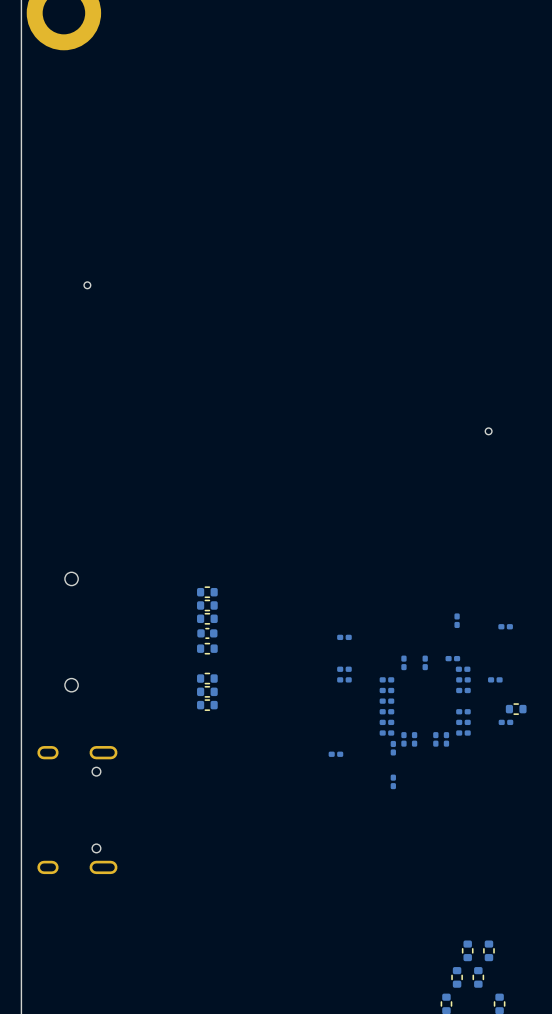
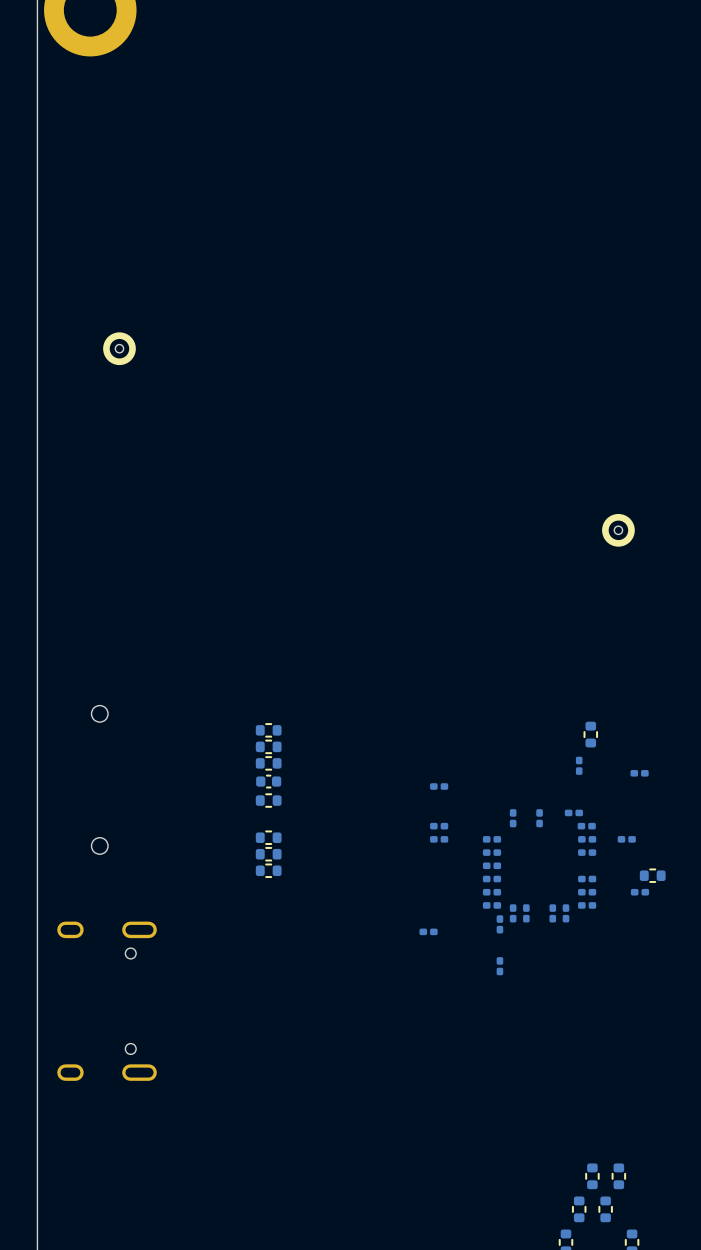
drawing: none -> [103, 332, 136, 366]
drawing: none -> [602, 513, 635, 547]
part: none -> (590, 734)

